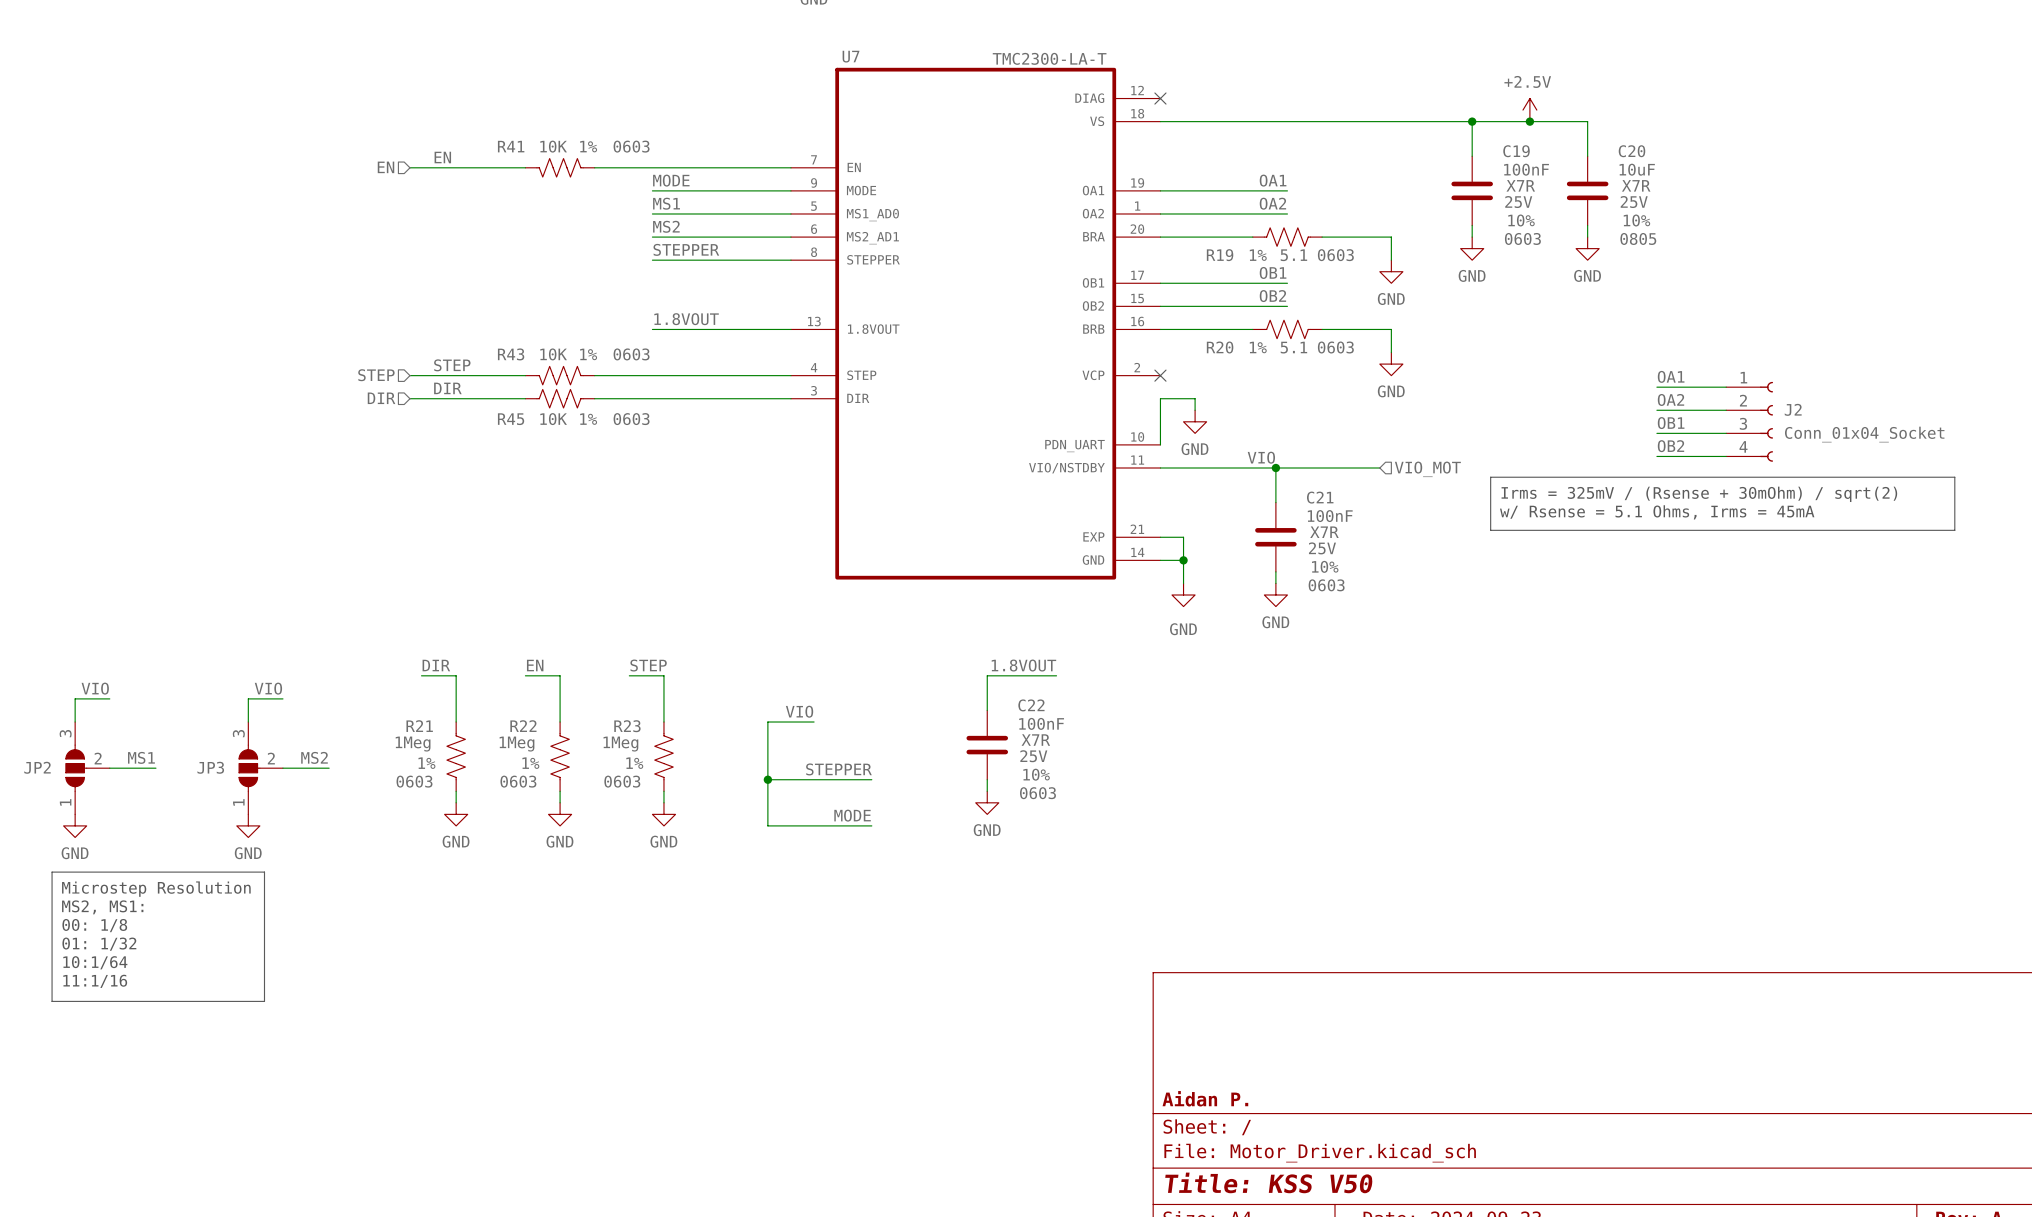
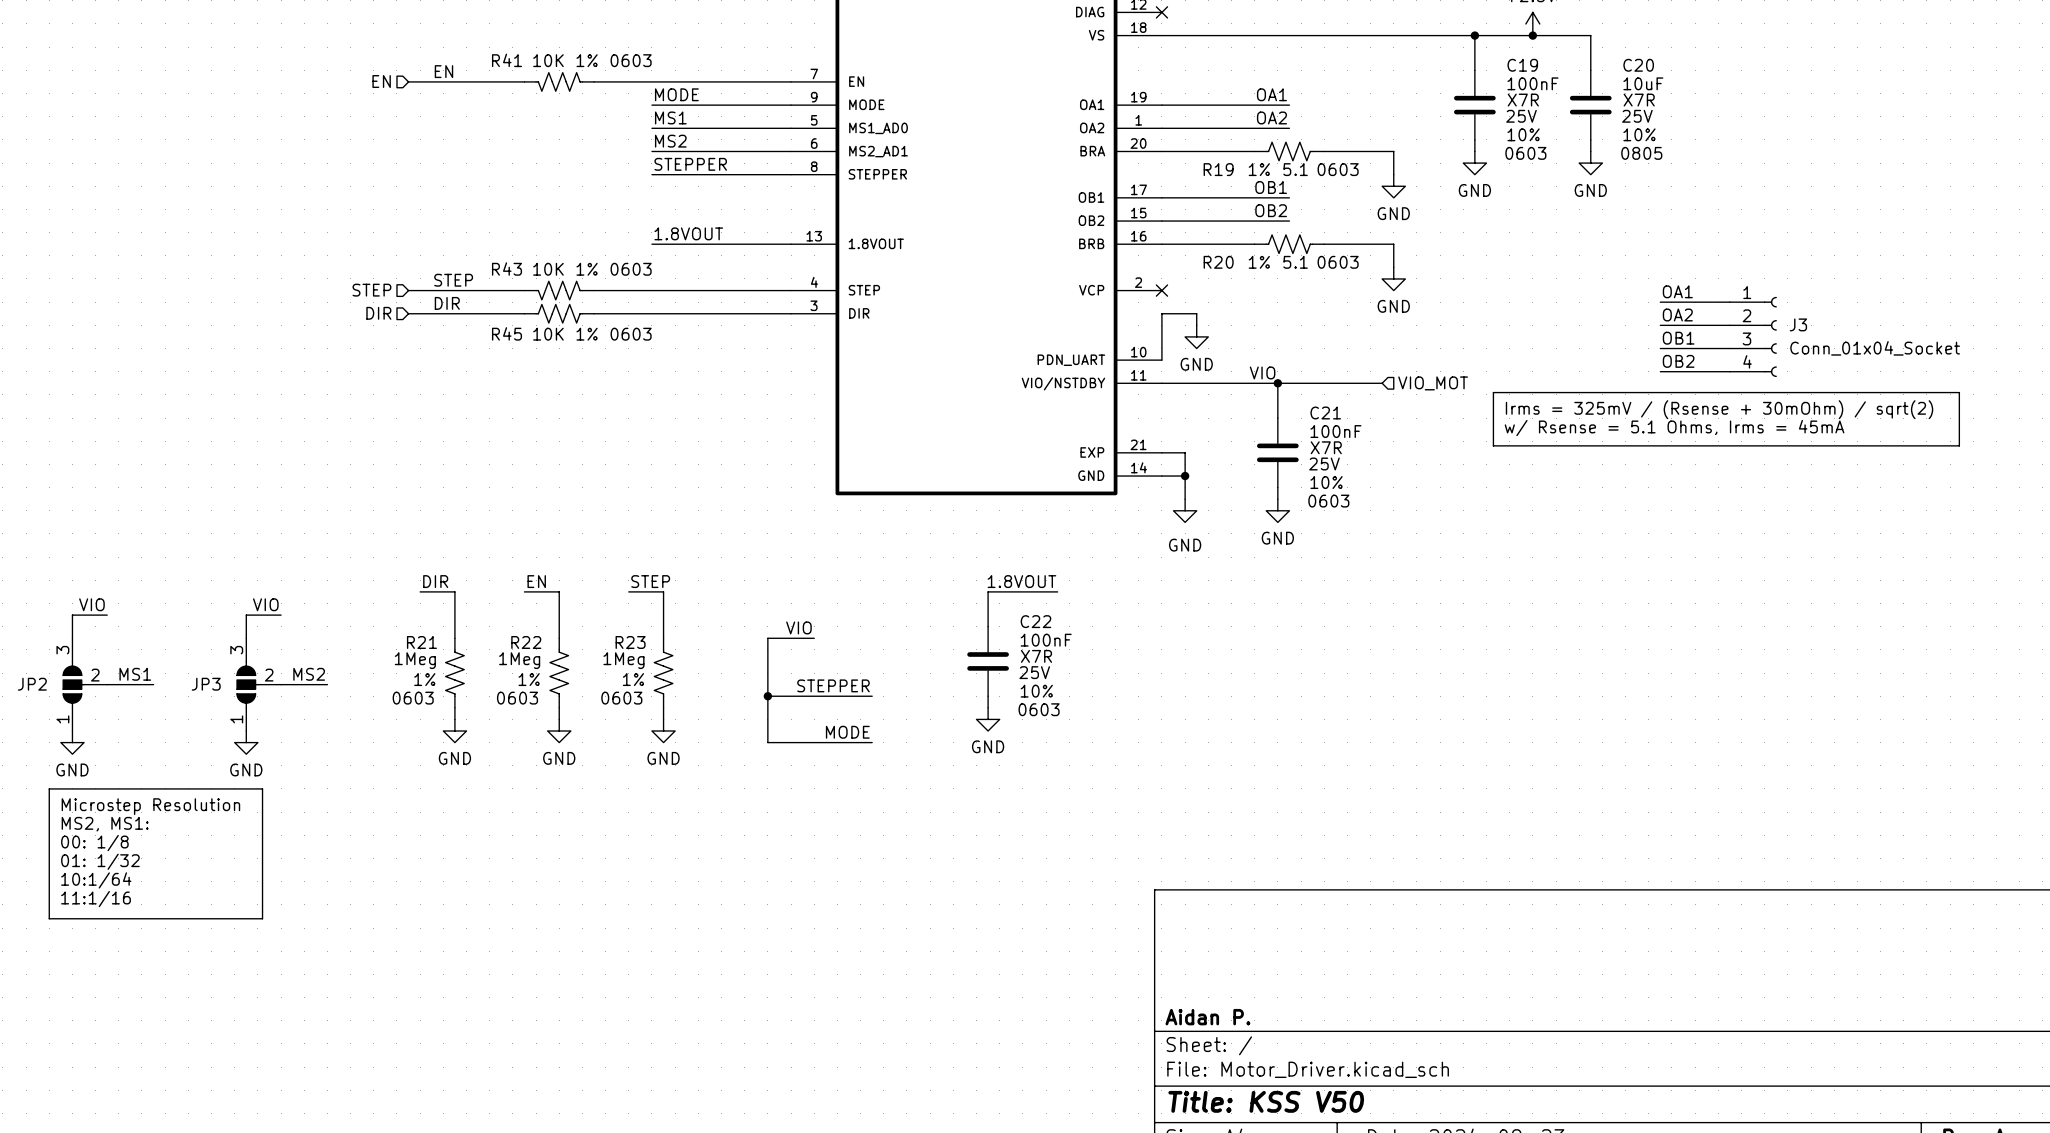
J2 name: J2 (1793, 409) -> J3 (1798, 324)

